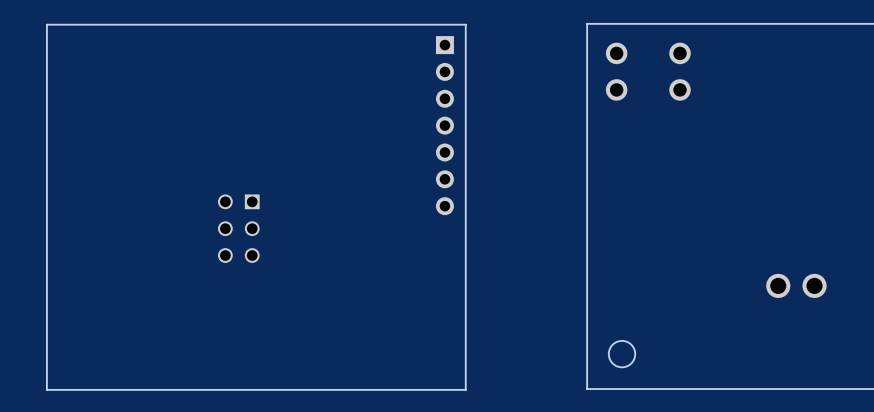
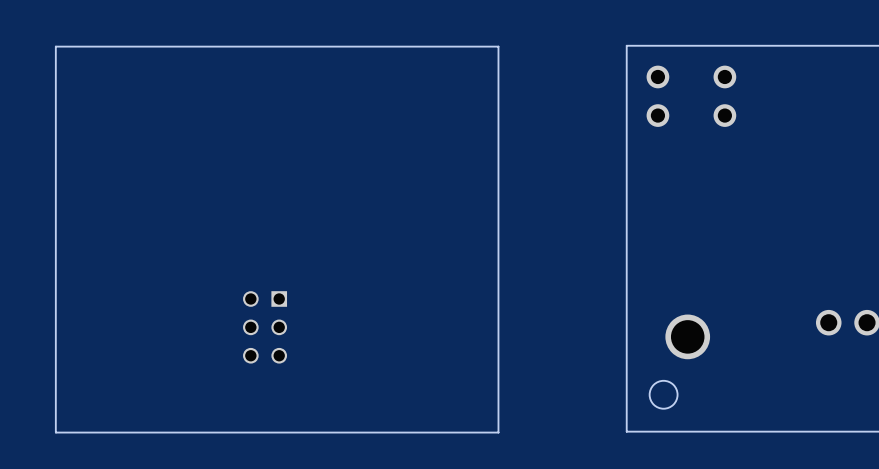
part: (444, 125) -> none
part position: (238, 228) -> (265, 327)
part: none -> (687, 336)

